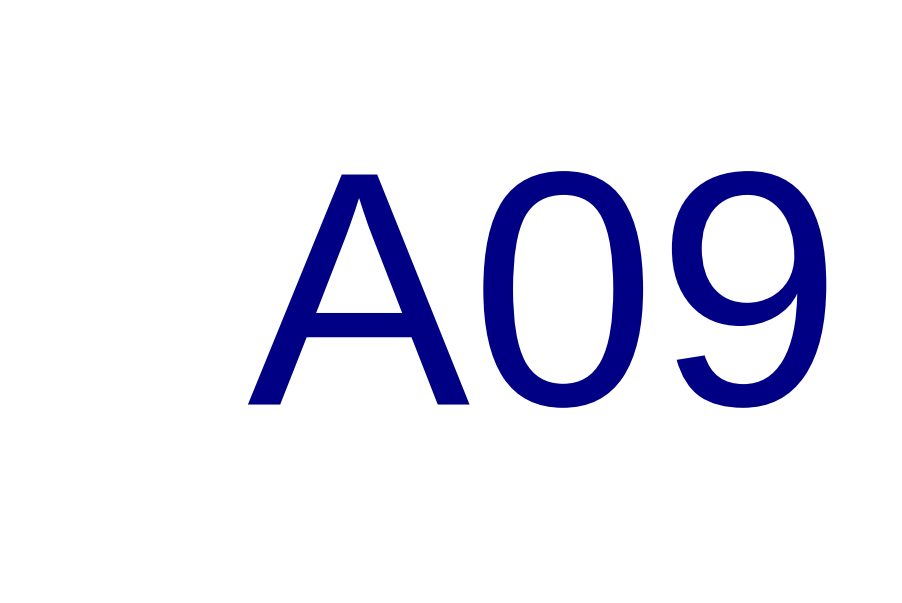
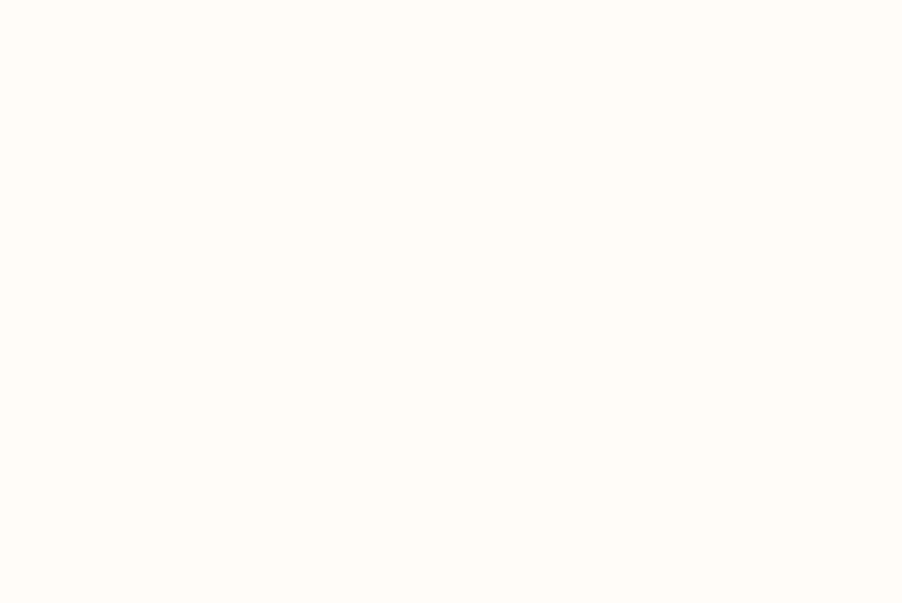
text: A09 (537, 289) -> none

